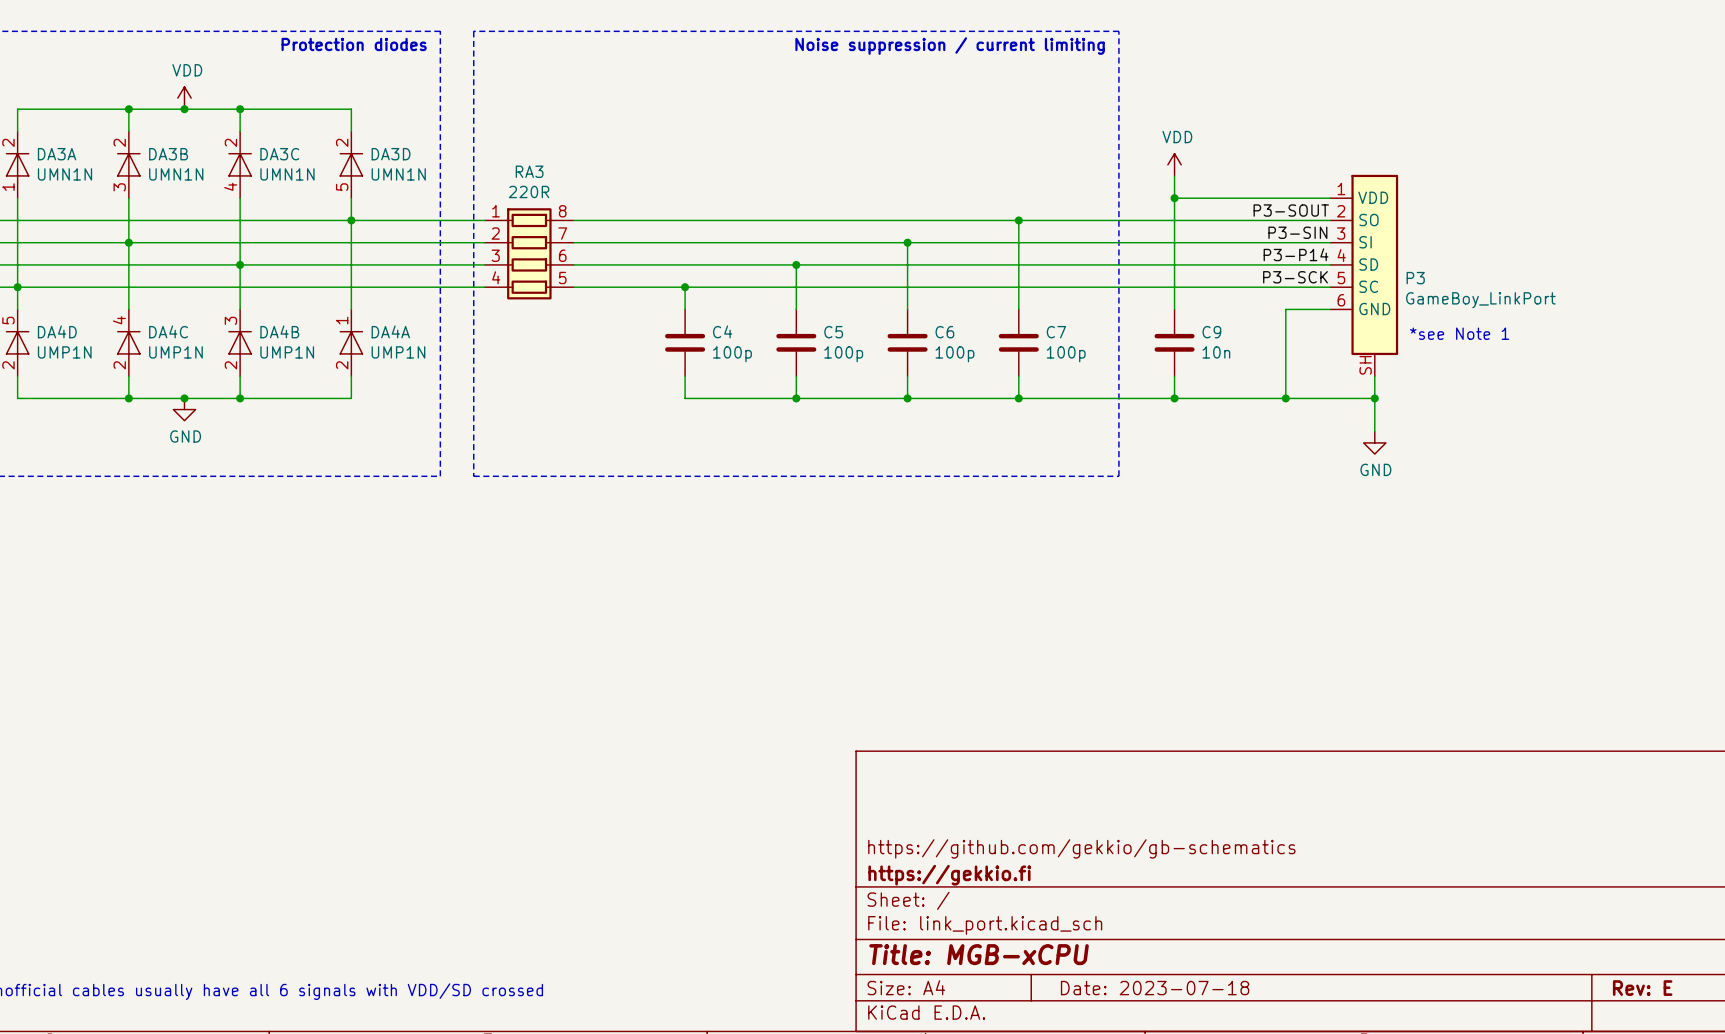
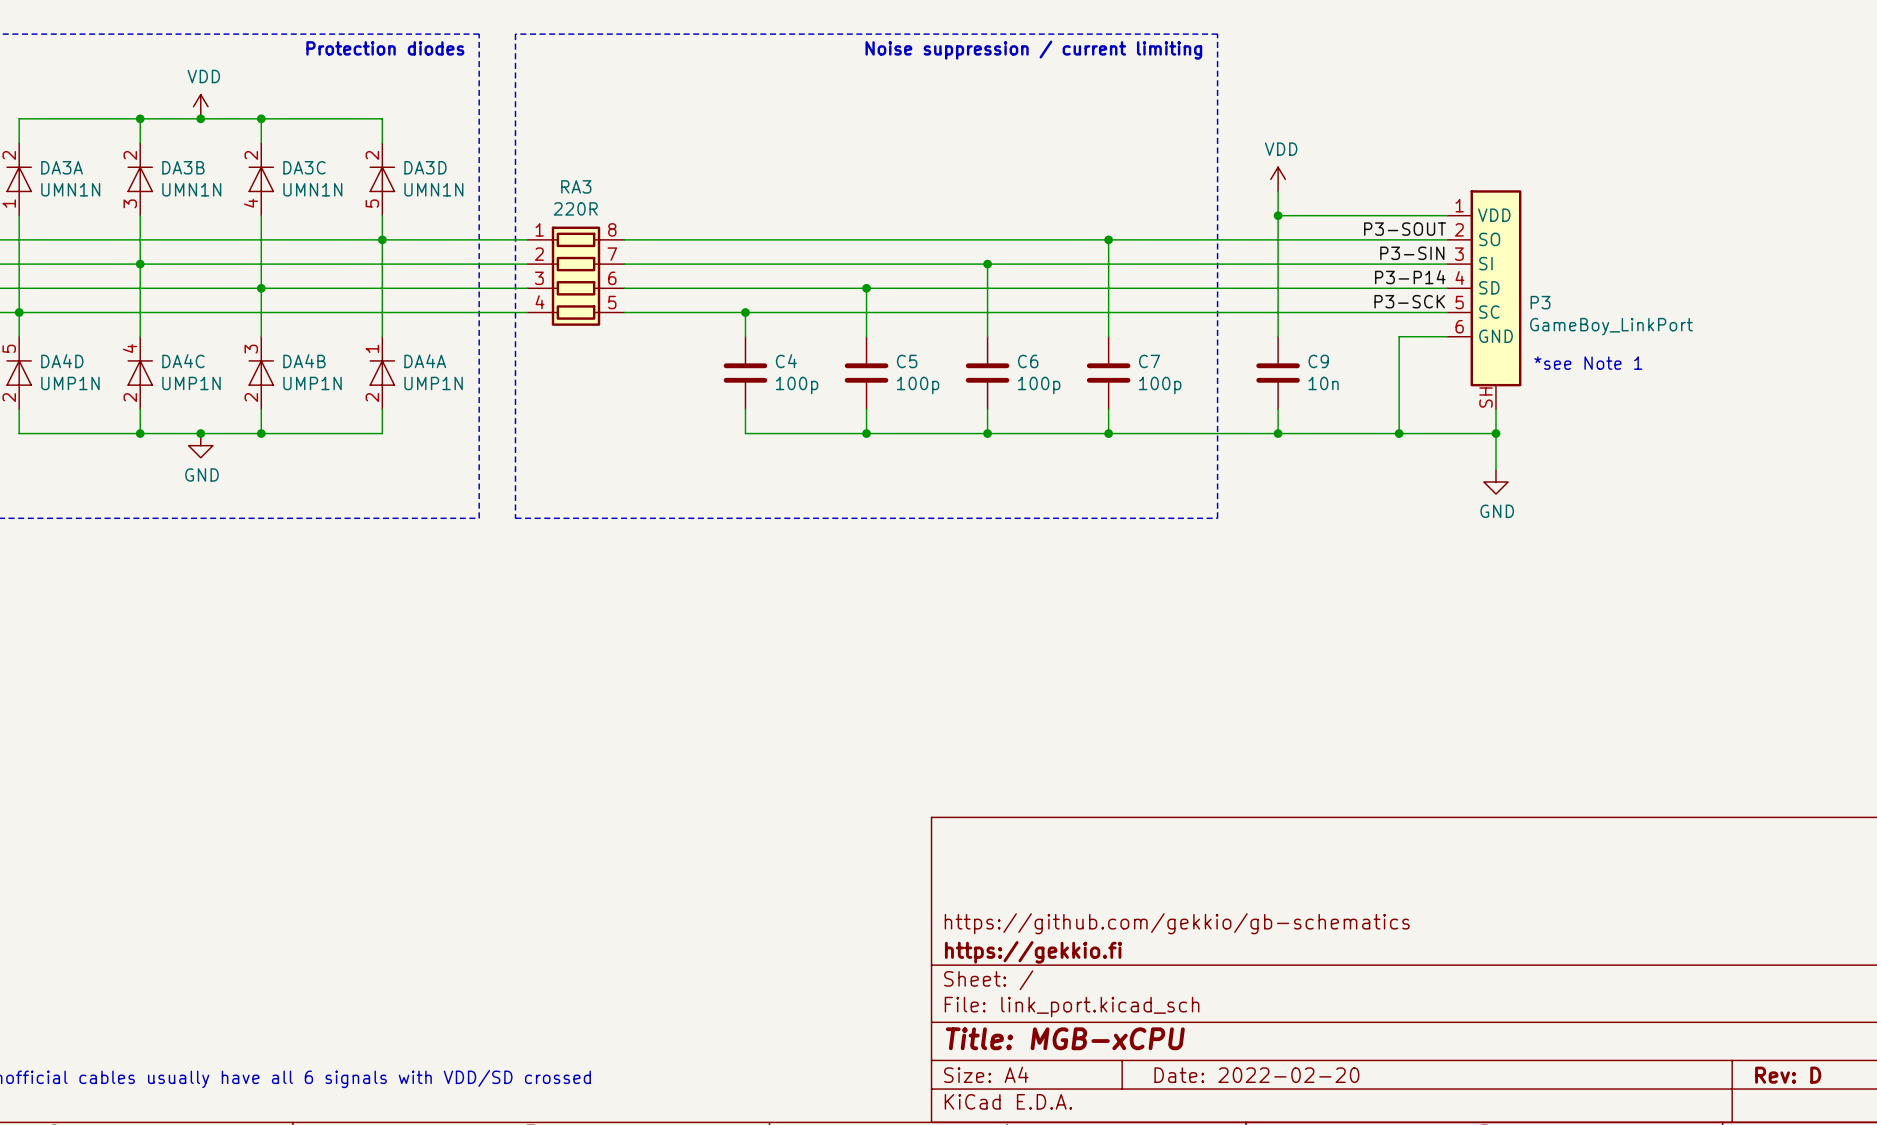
title block: Date: 2023-07-18 (1155, 988) -> Date: 2022-02-20 (1256, 1075)
title block: Rev: E (1642, 988) -> Rev: D (1788, 1075)

